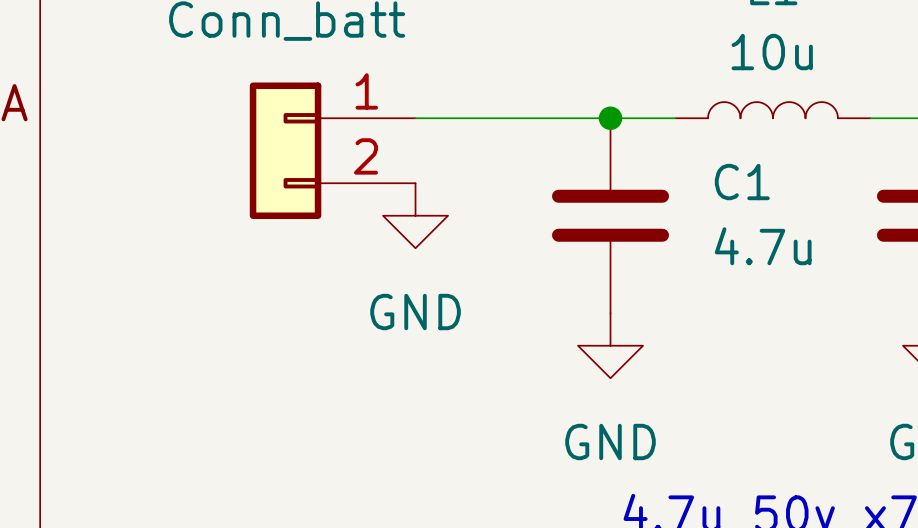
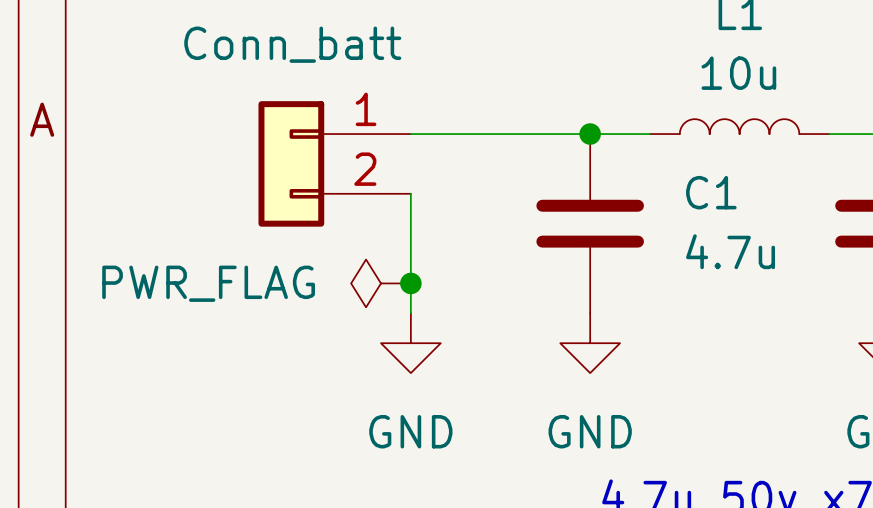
wire: none -> (410, 193) (410, 313)
power symbol position: GND (415, 215) -> GND (410, 343)
power symbol: none -> PWR_FLAG (380, 283)
junction: none -> (410, 283)

